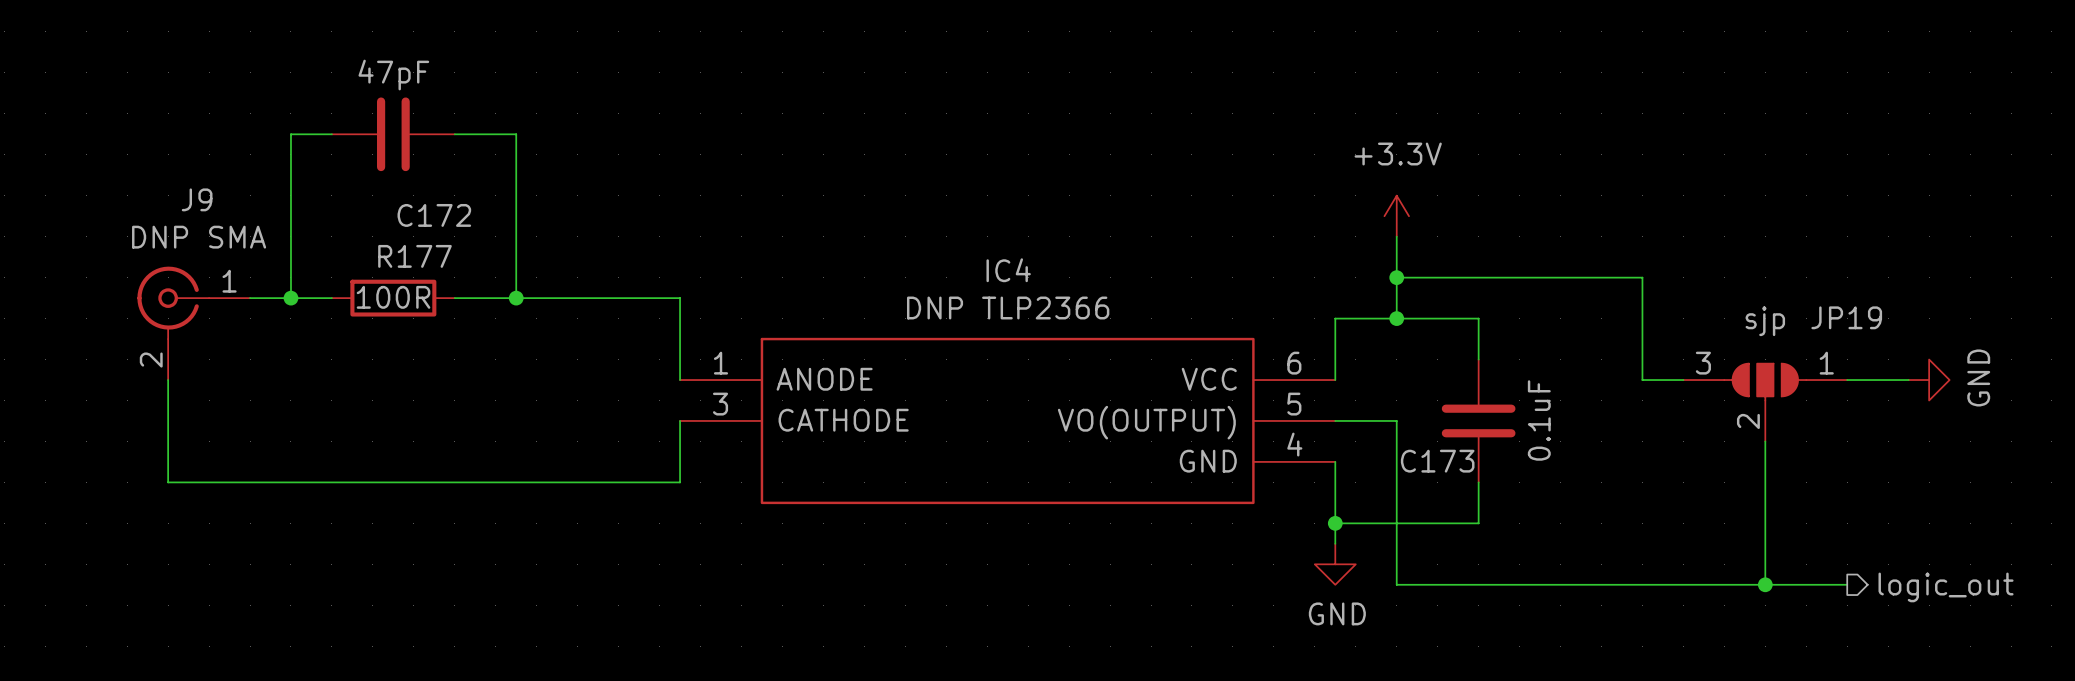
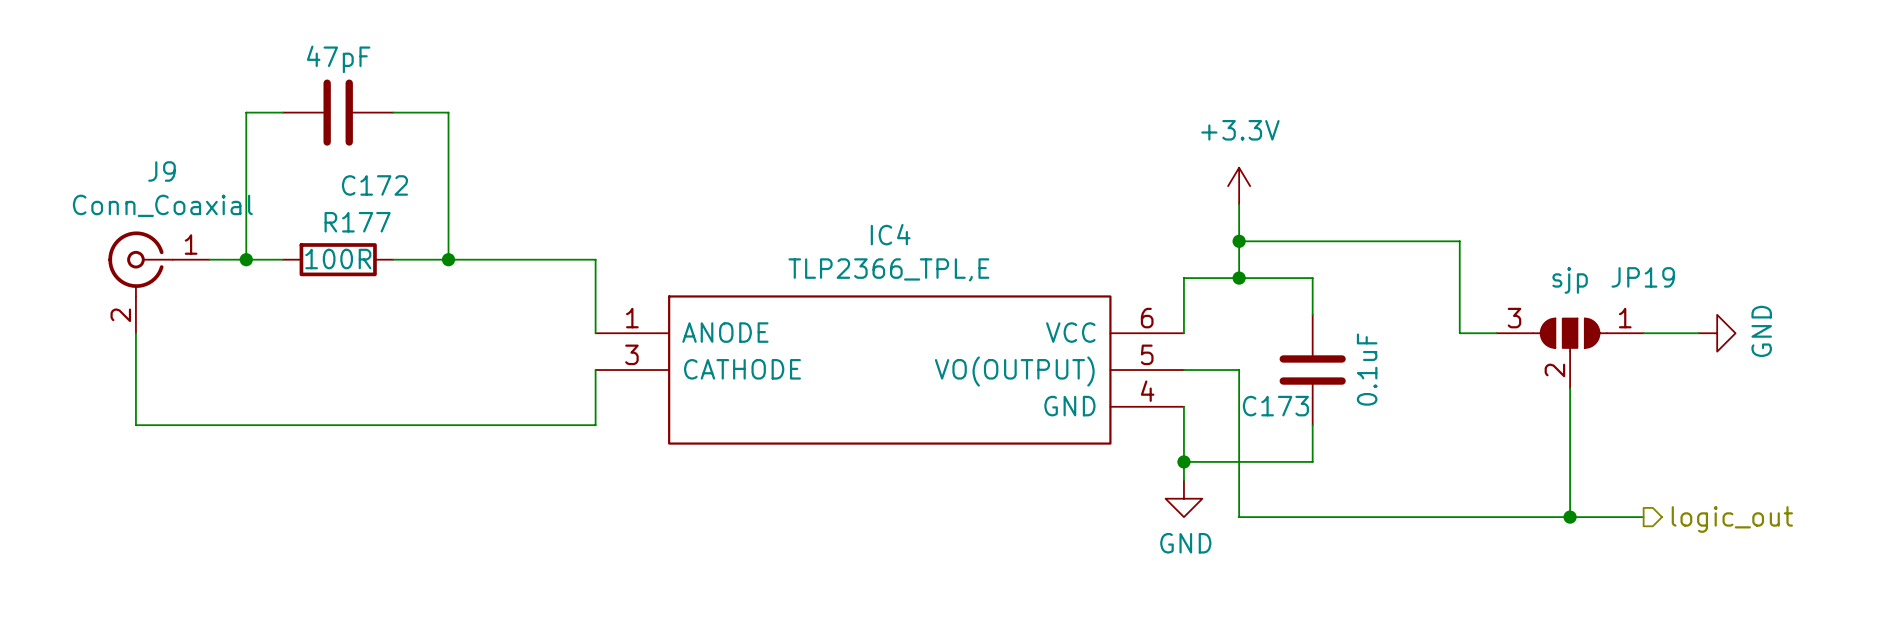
J9 value: DNP SMA (199, 237) -> Conn_Coaxial (162, 205)
IC4 value: DNP TLP2366 (1008, 307) -> TLP2366_TPL,E (888, 269)

